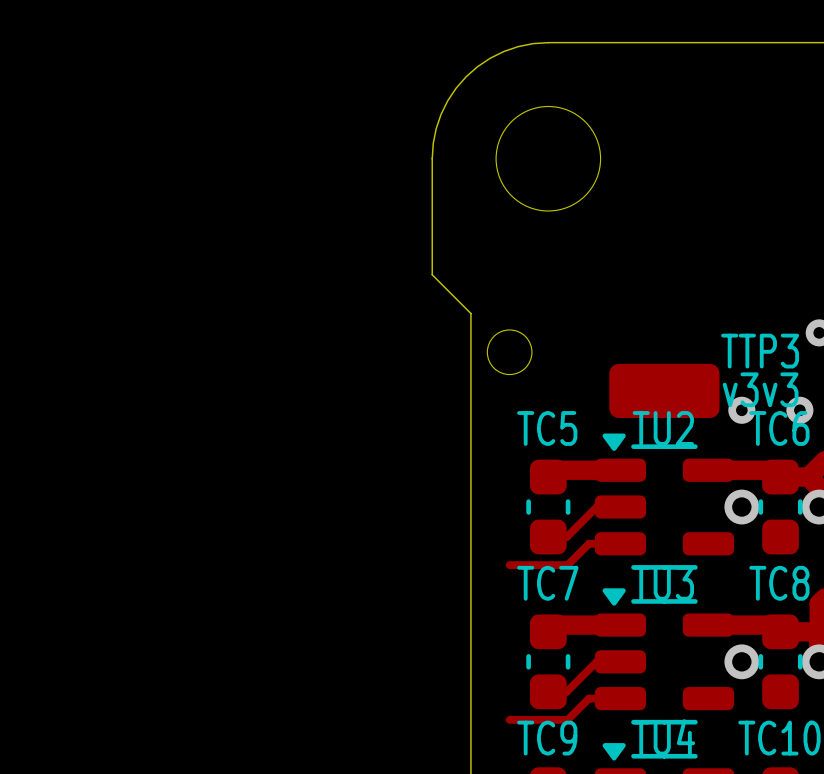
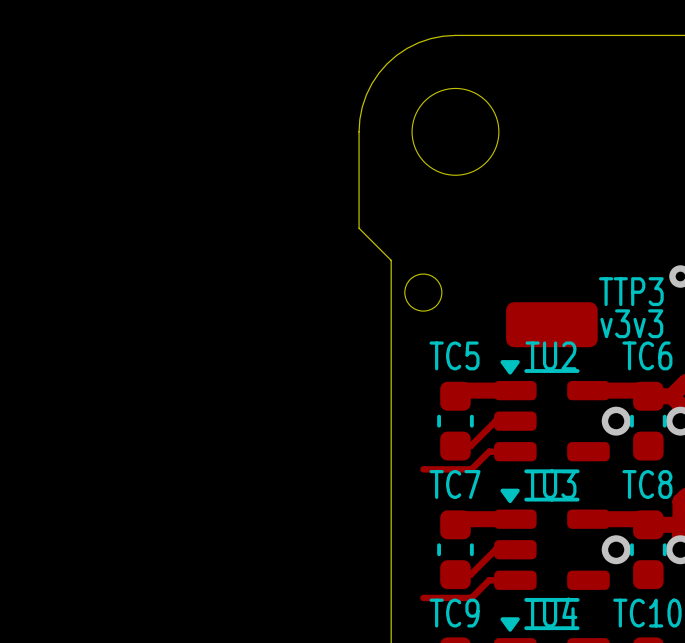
via: (741, 410) -> none
via: (799, 410) -> none

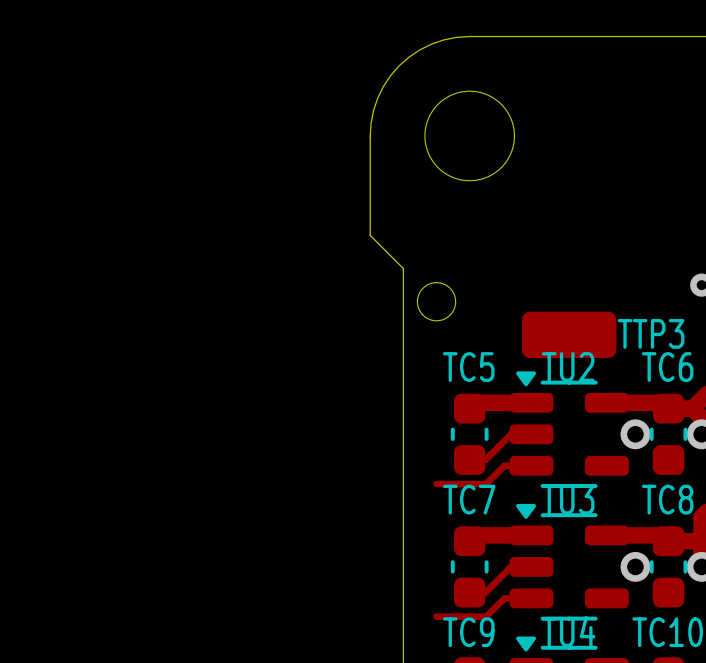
TTP3 name position: TTP3 (631, 291) -> TTP3 (651, 333)
TTP3 value: v3v3 (631, 323) -> none

